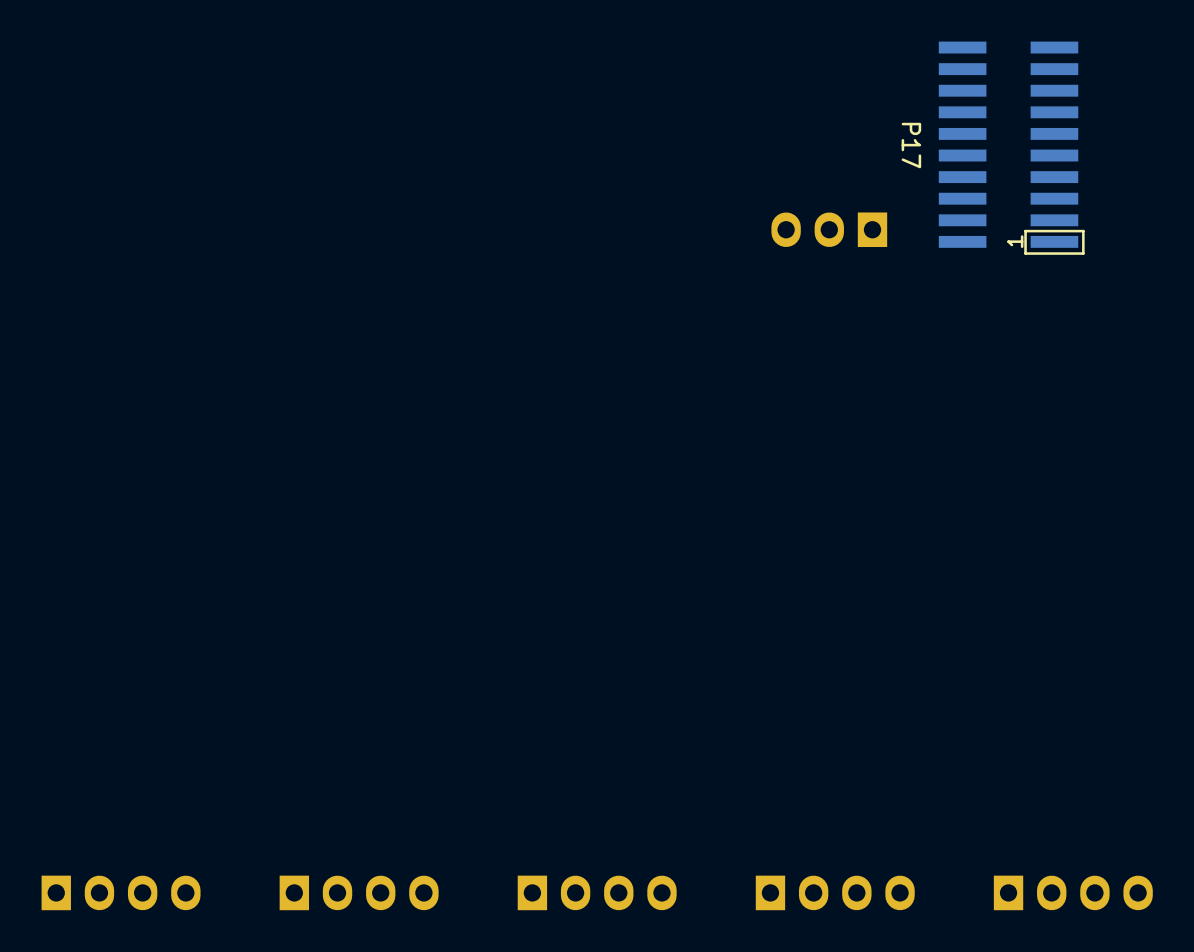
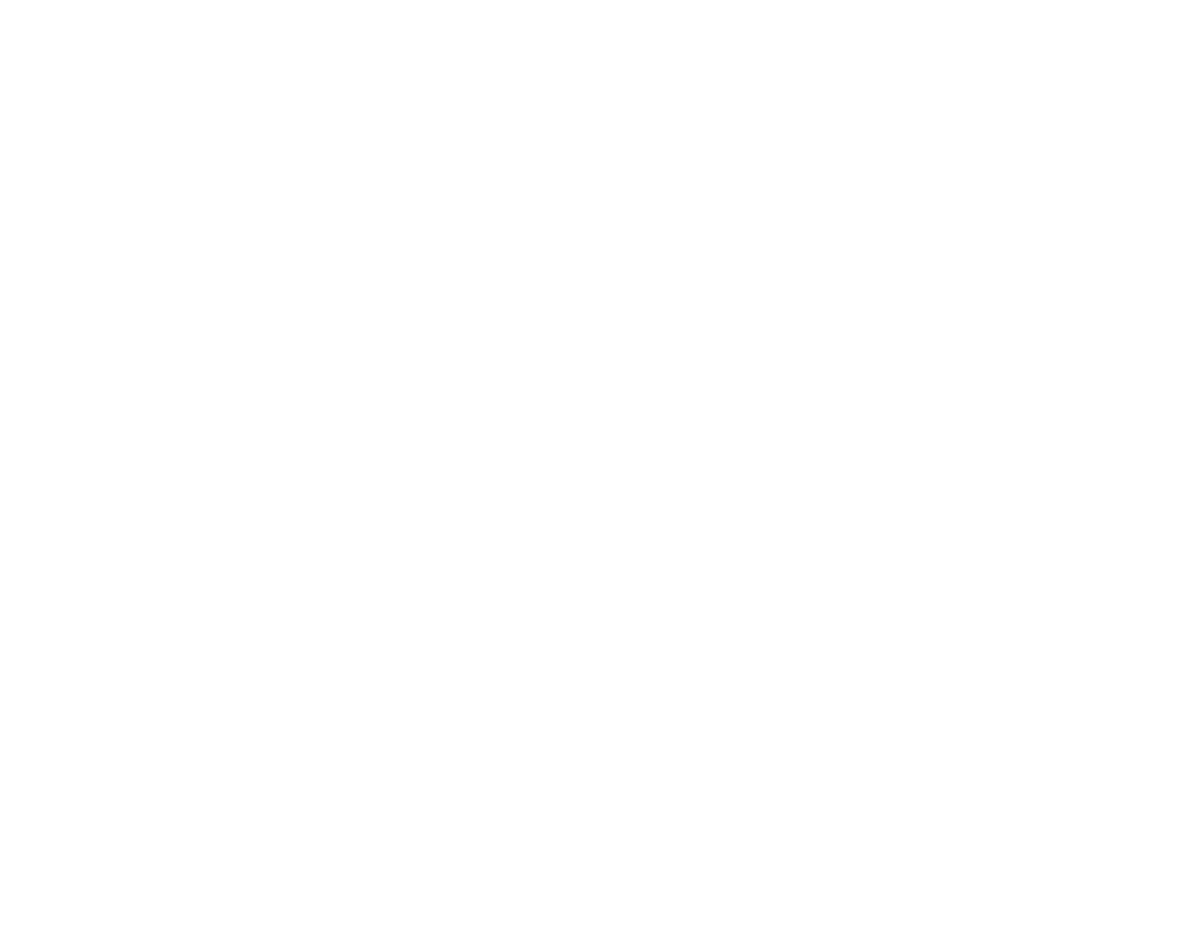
P17: (1011, 148) -> none
part: (829, 229) -> none
part: (121, 892) -> none
part: (359, 892) -> none
part: (597, 892) -> none
part: (835, 892) -> none
part: (1073, 892) -> none

